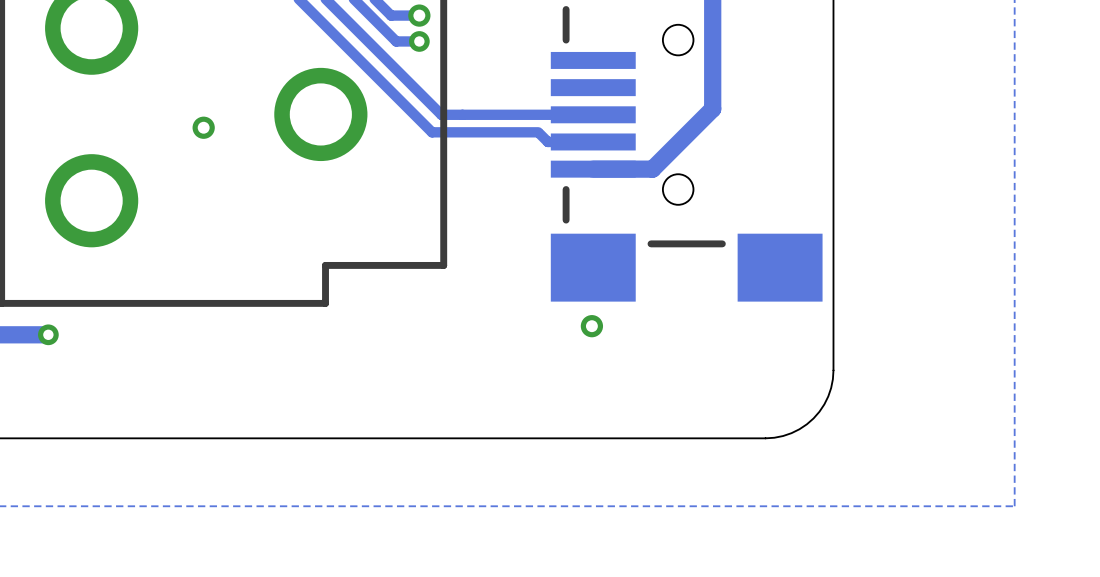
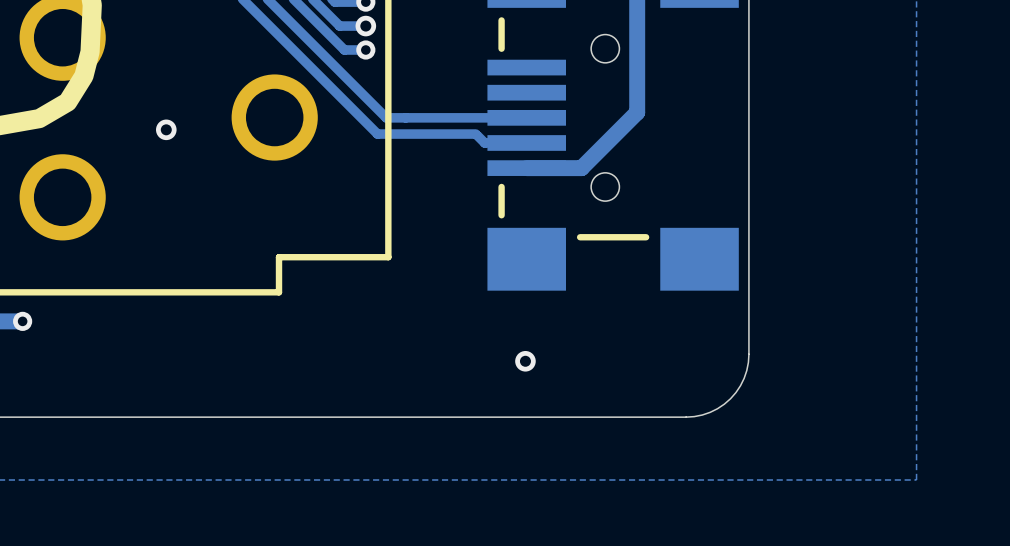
via position: (591, 326) -> (525, 361)

